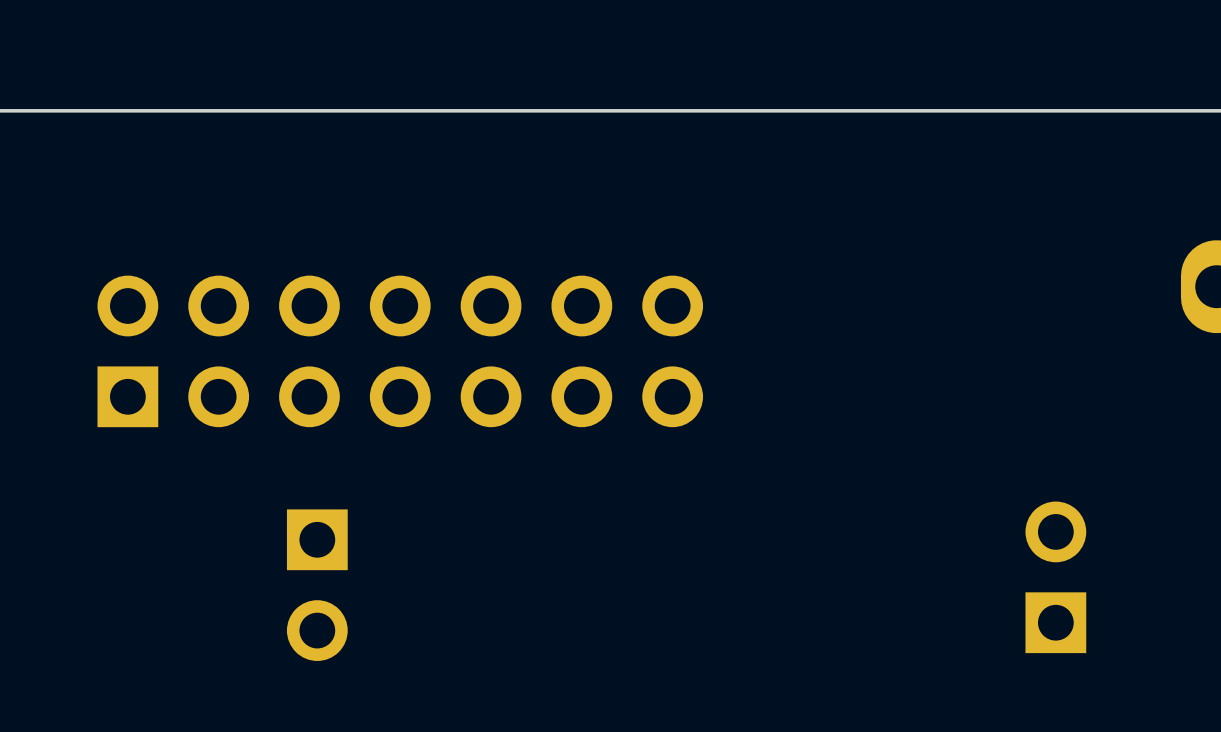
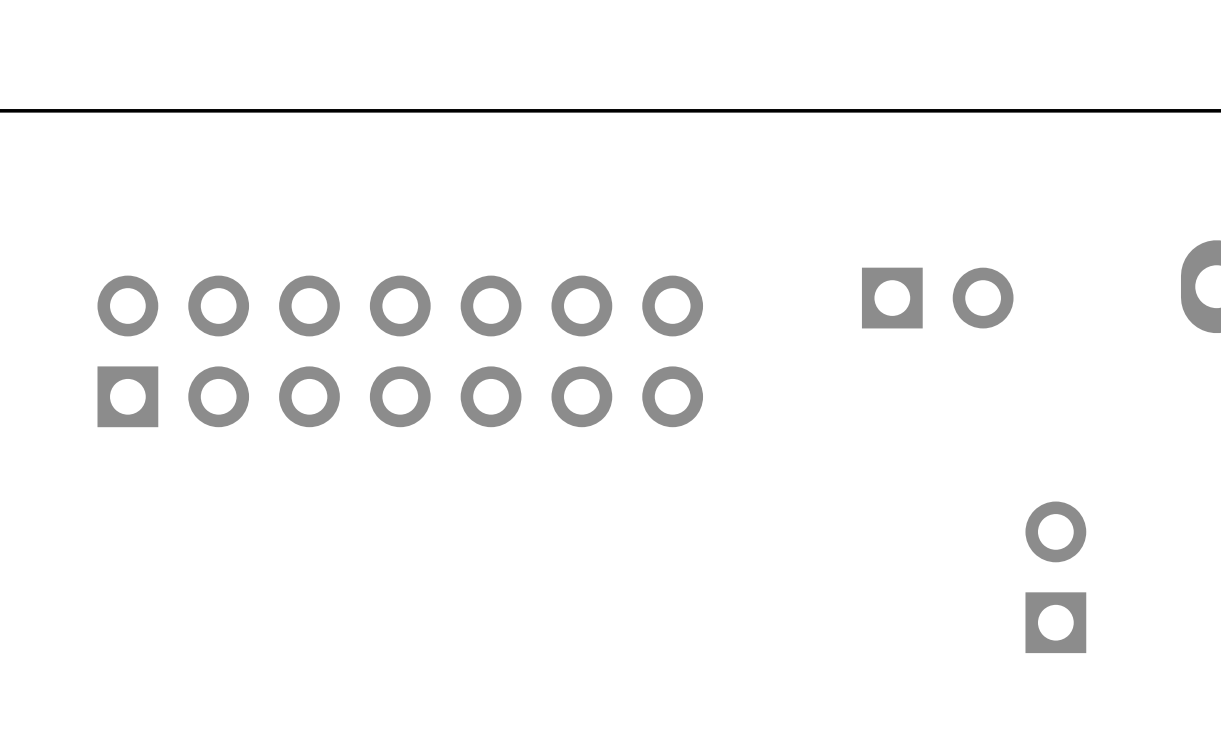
part rotation: 0° (317, 585) -> 90° counterclockwise (937, 298)
part position: (317, 585) -> (937, 298)

